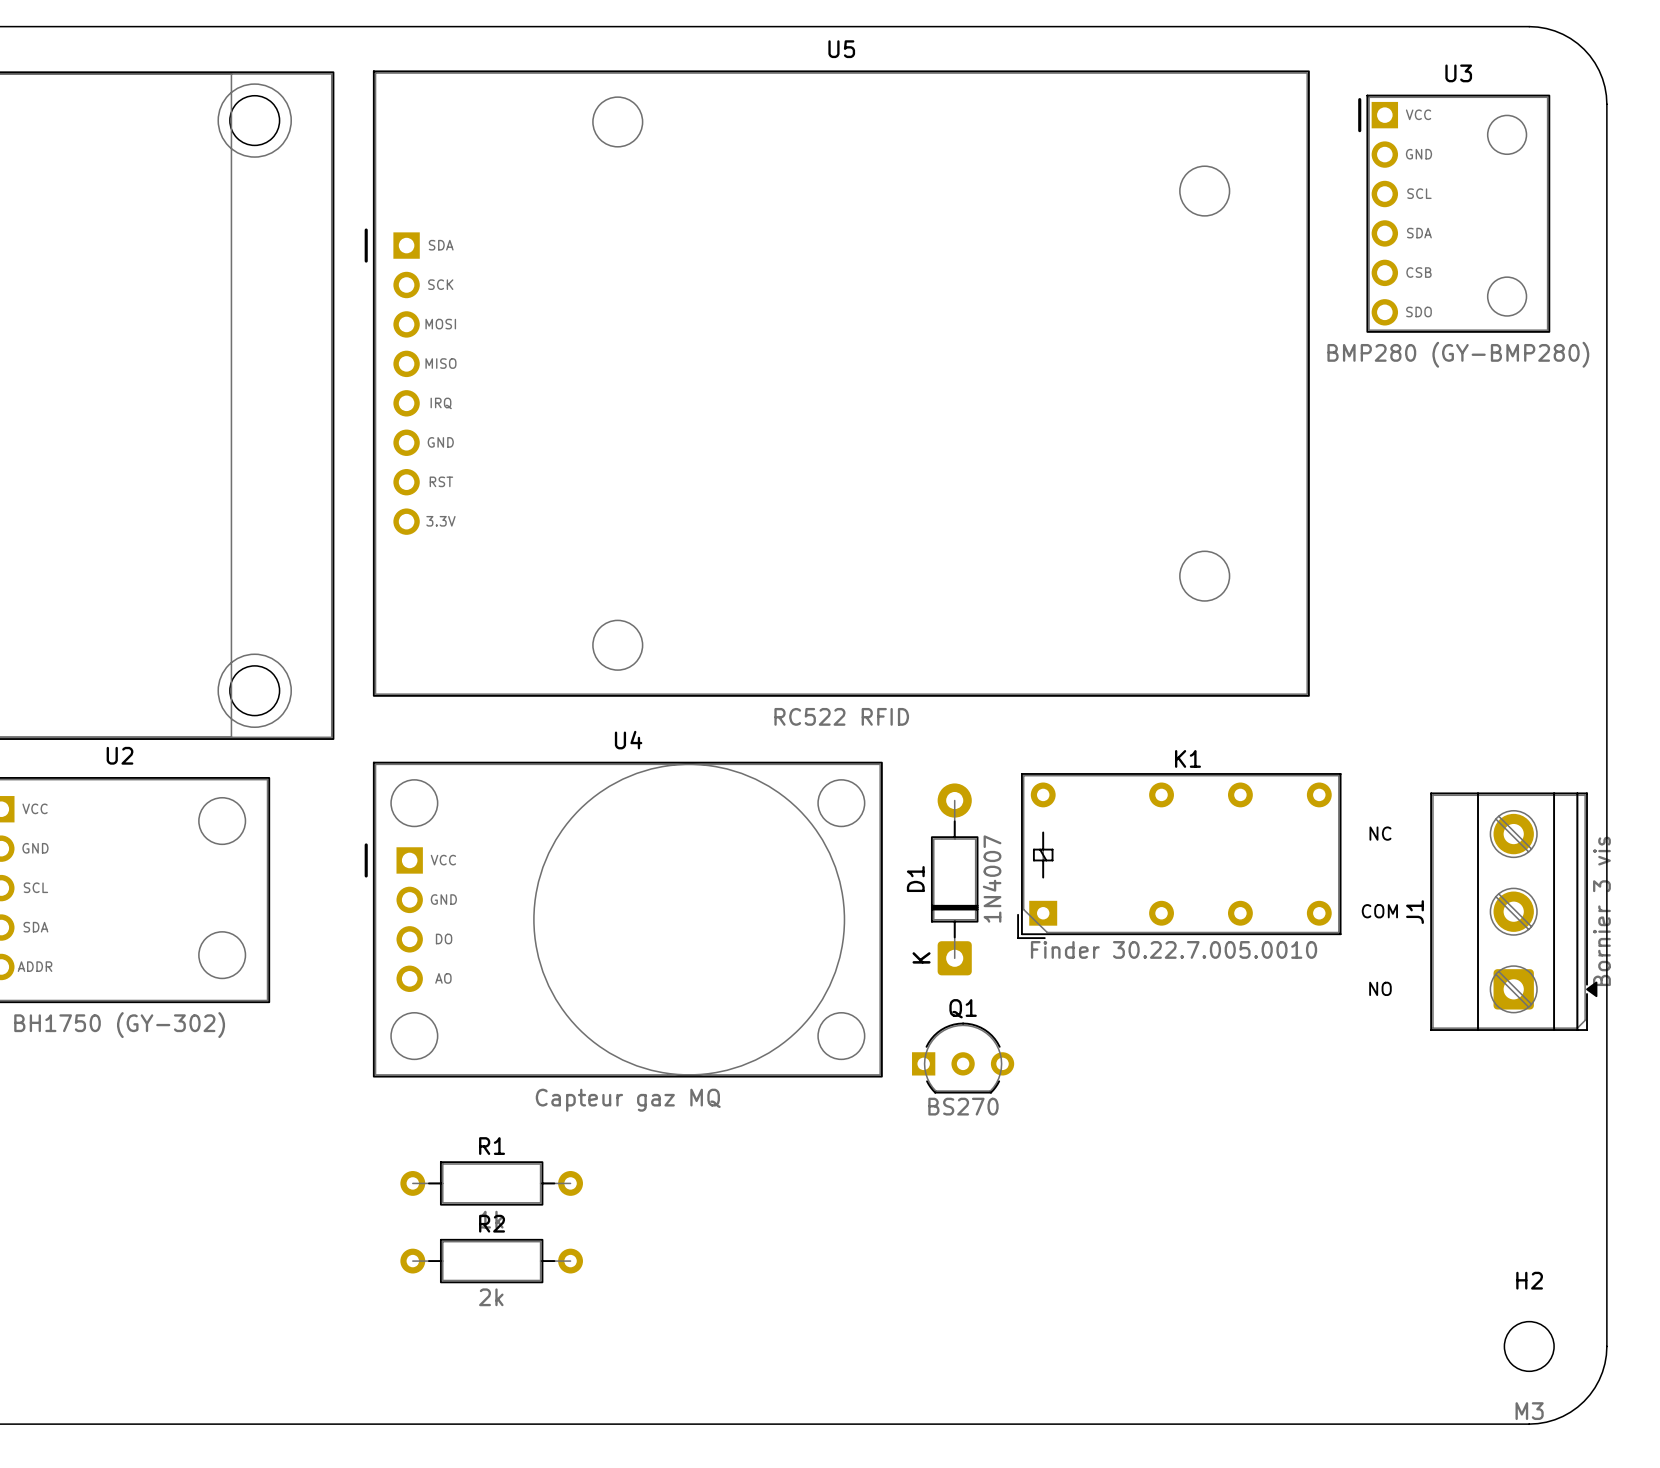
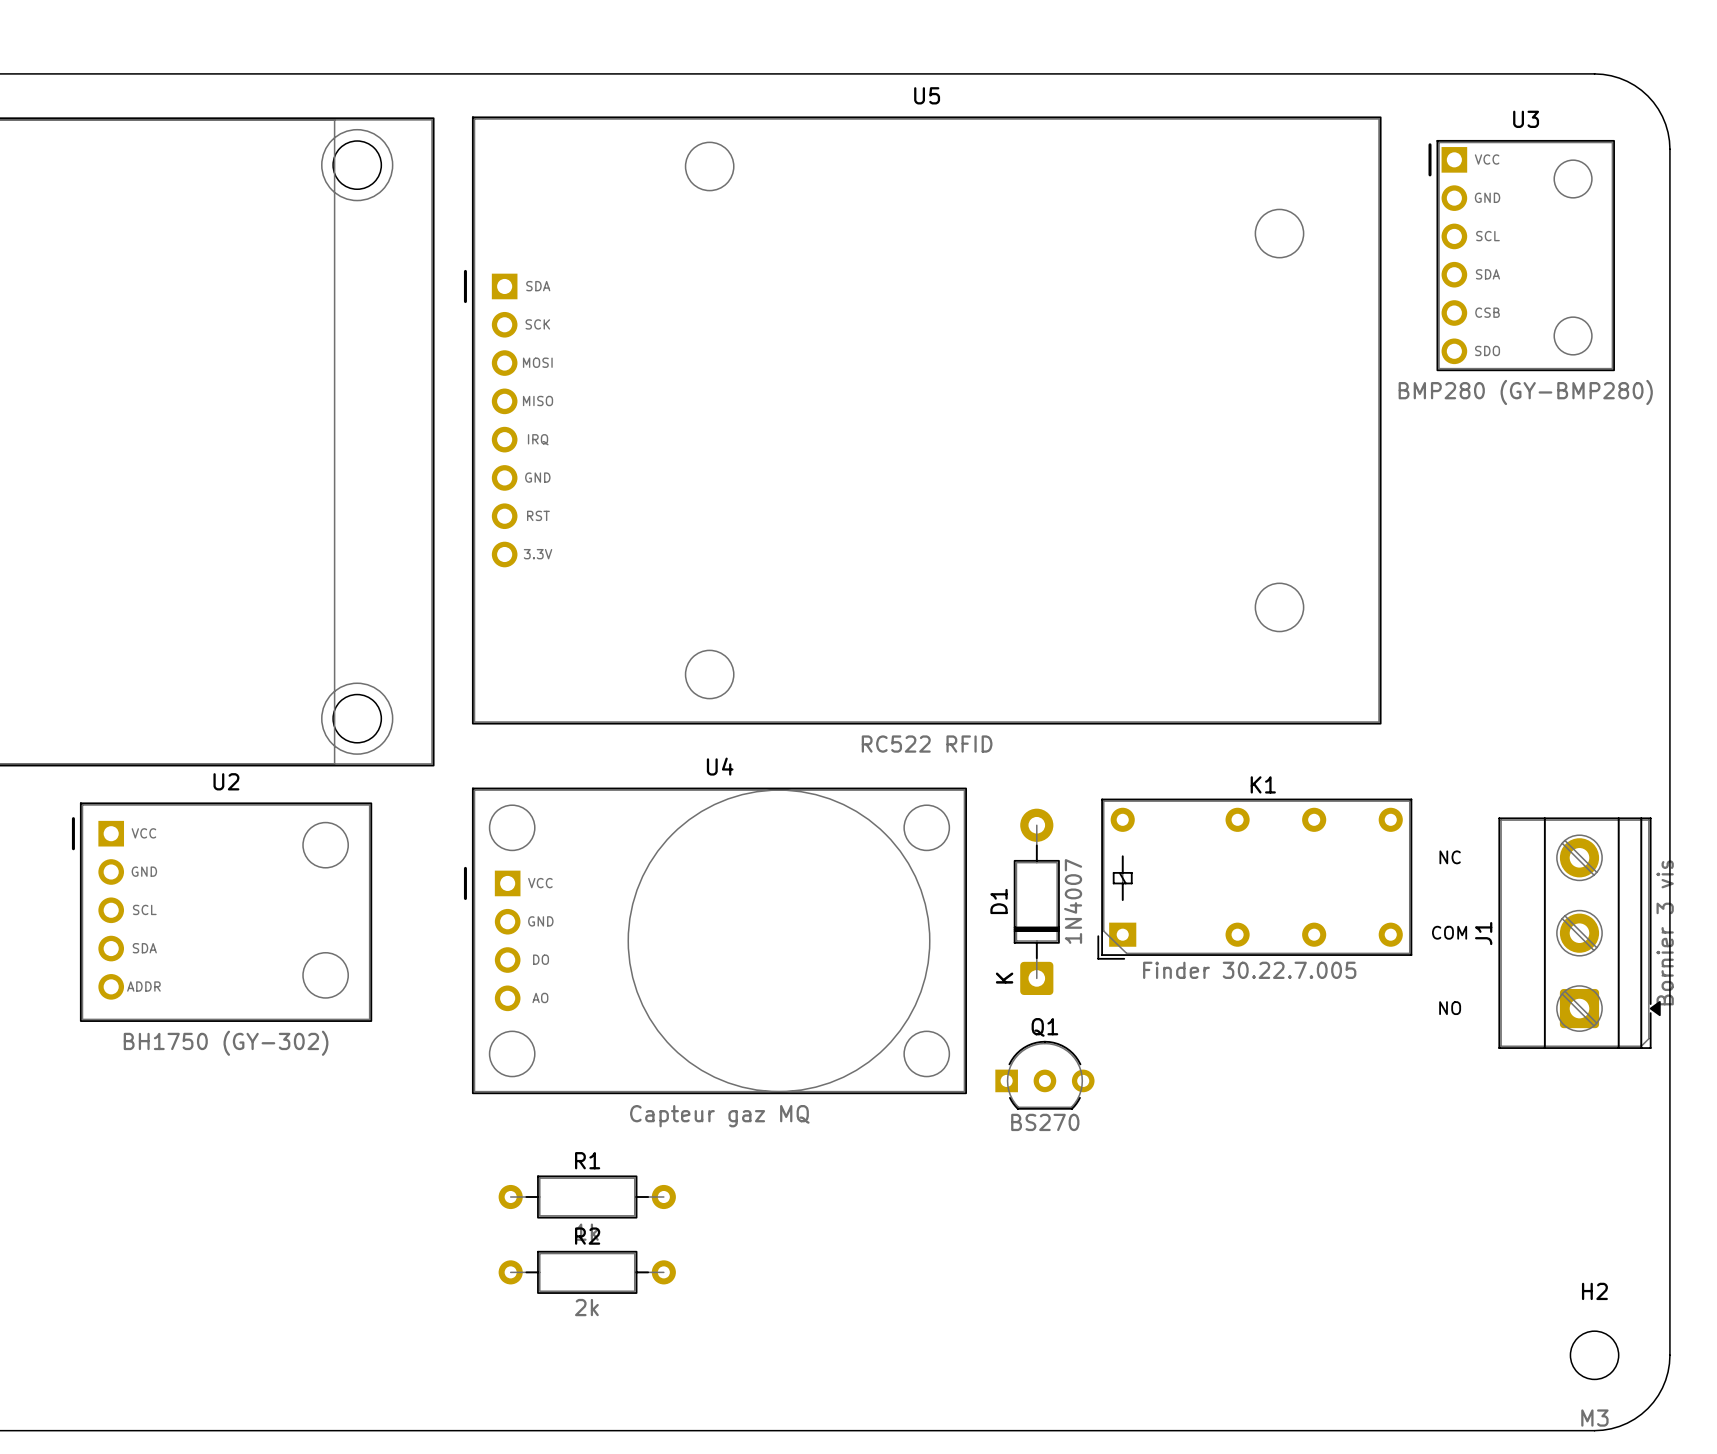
K1 value: Finder 30.22.7.005.0010 (1174, 949) -> Finder 30.22.7.005 (1249, 970)

